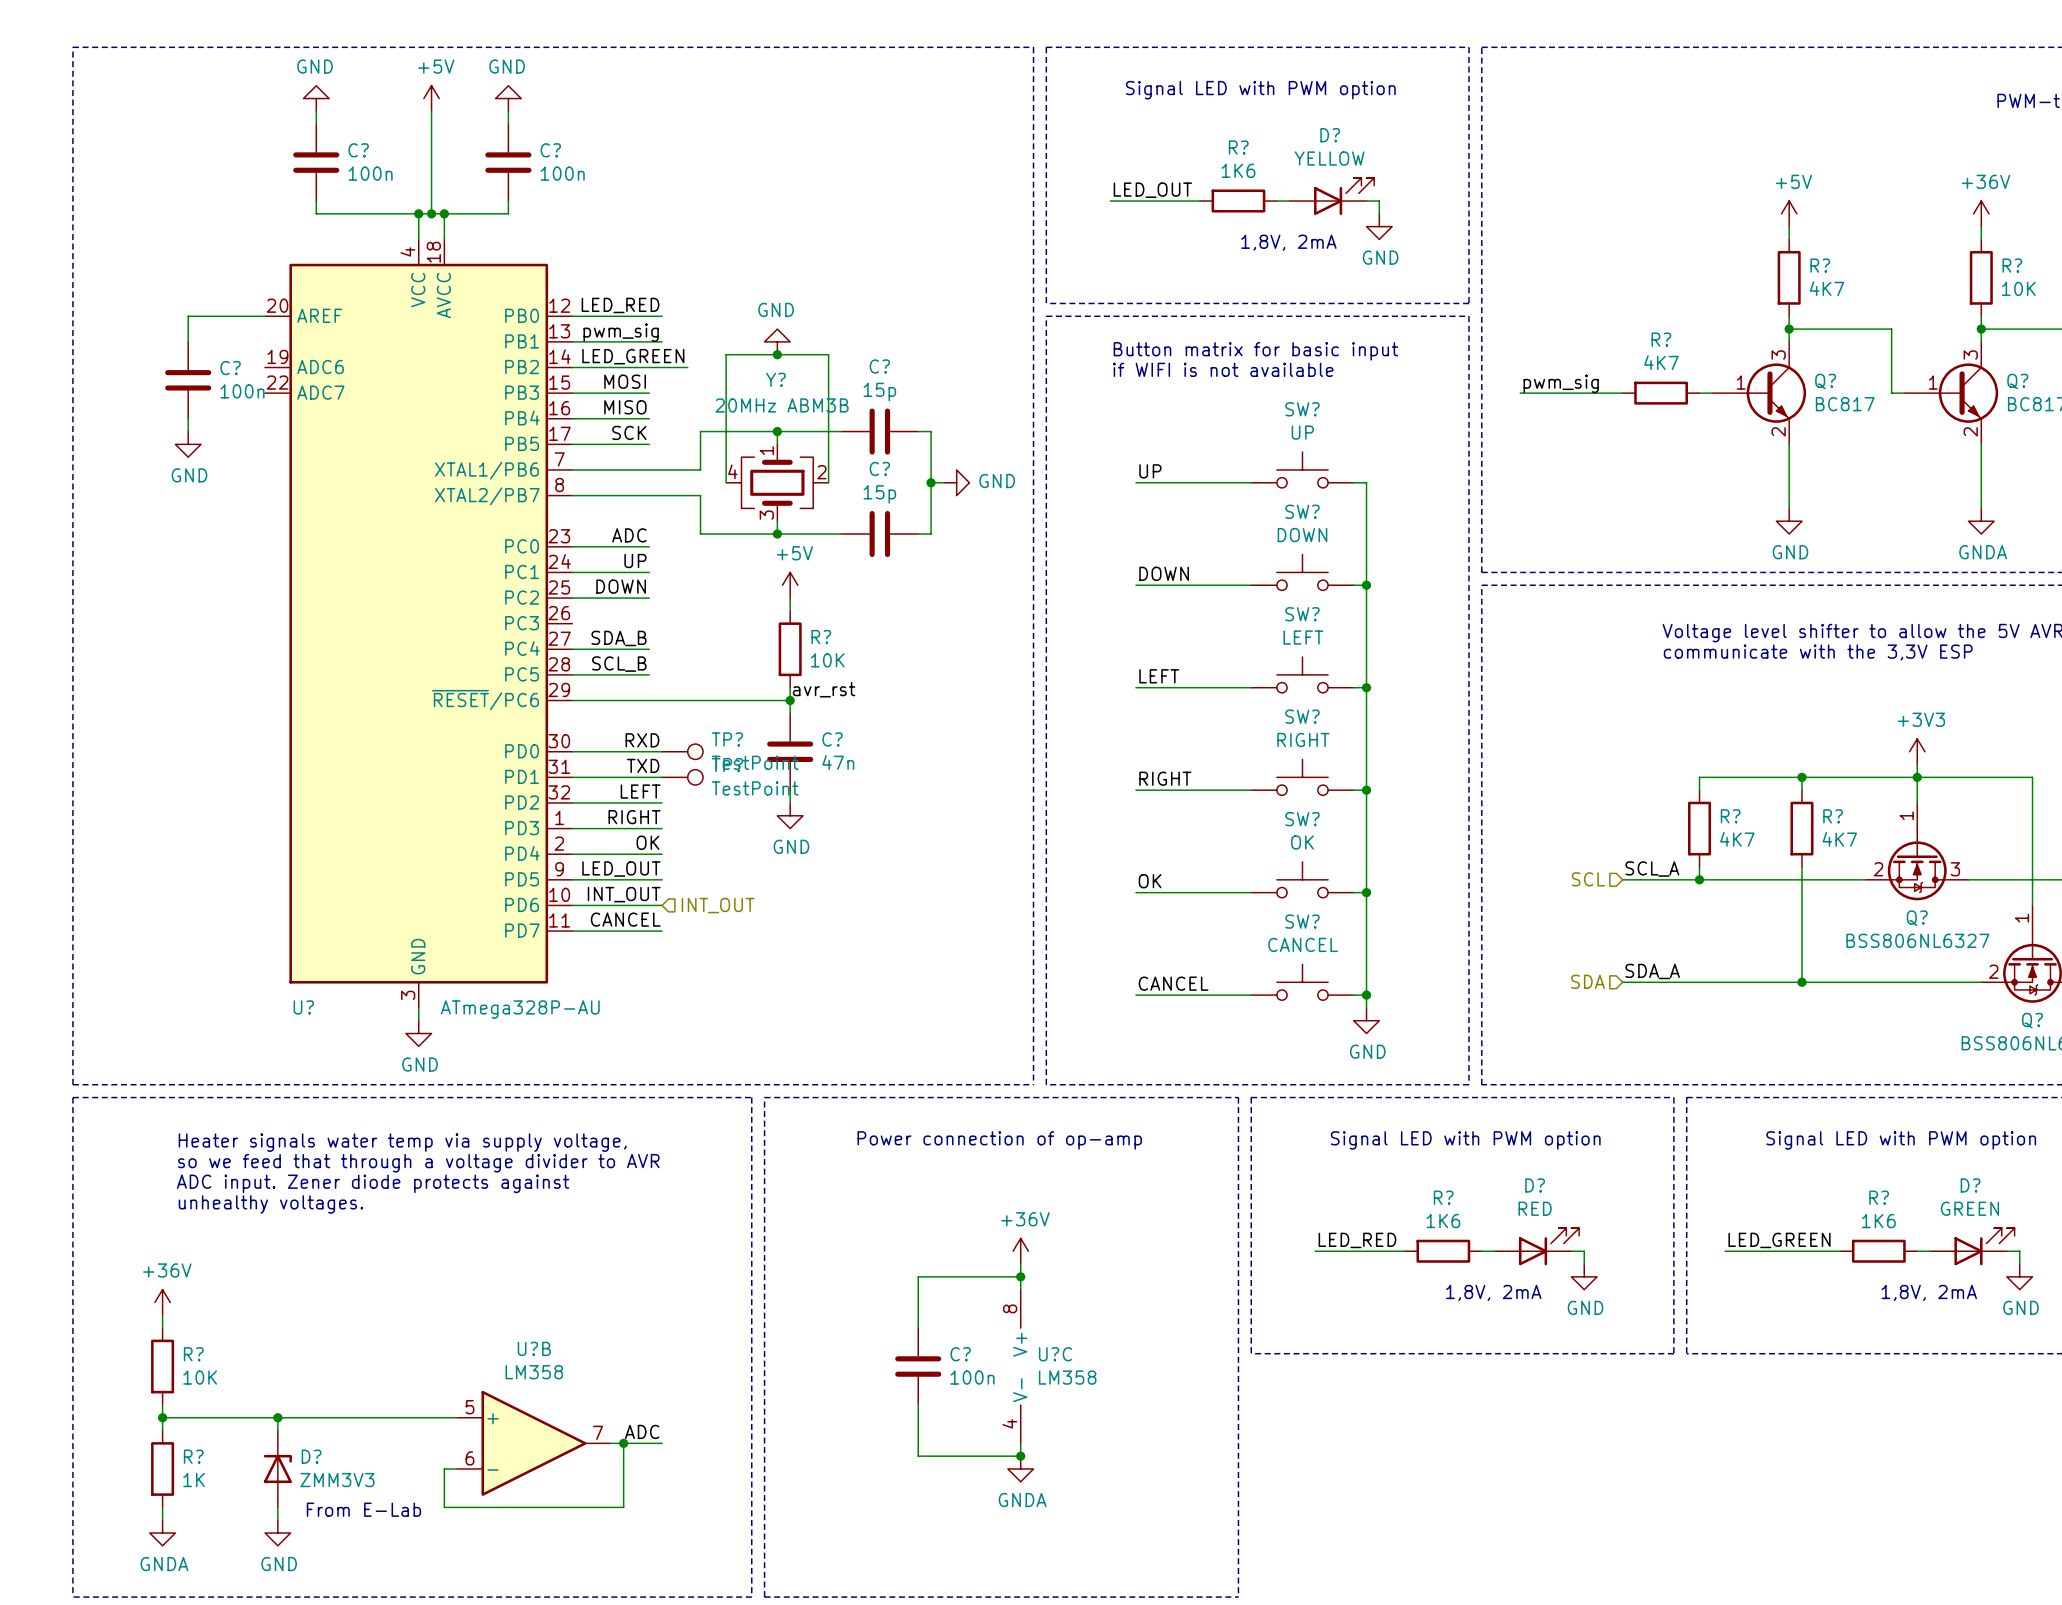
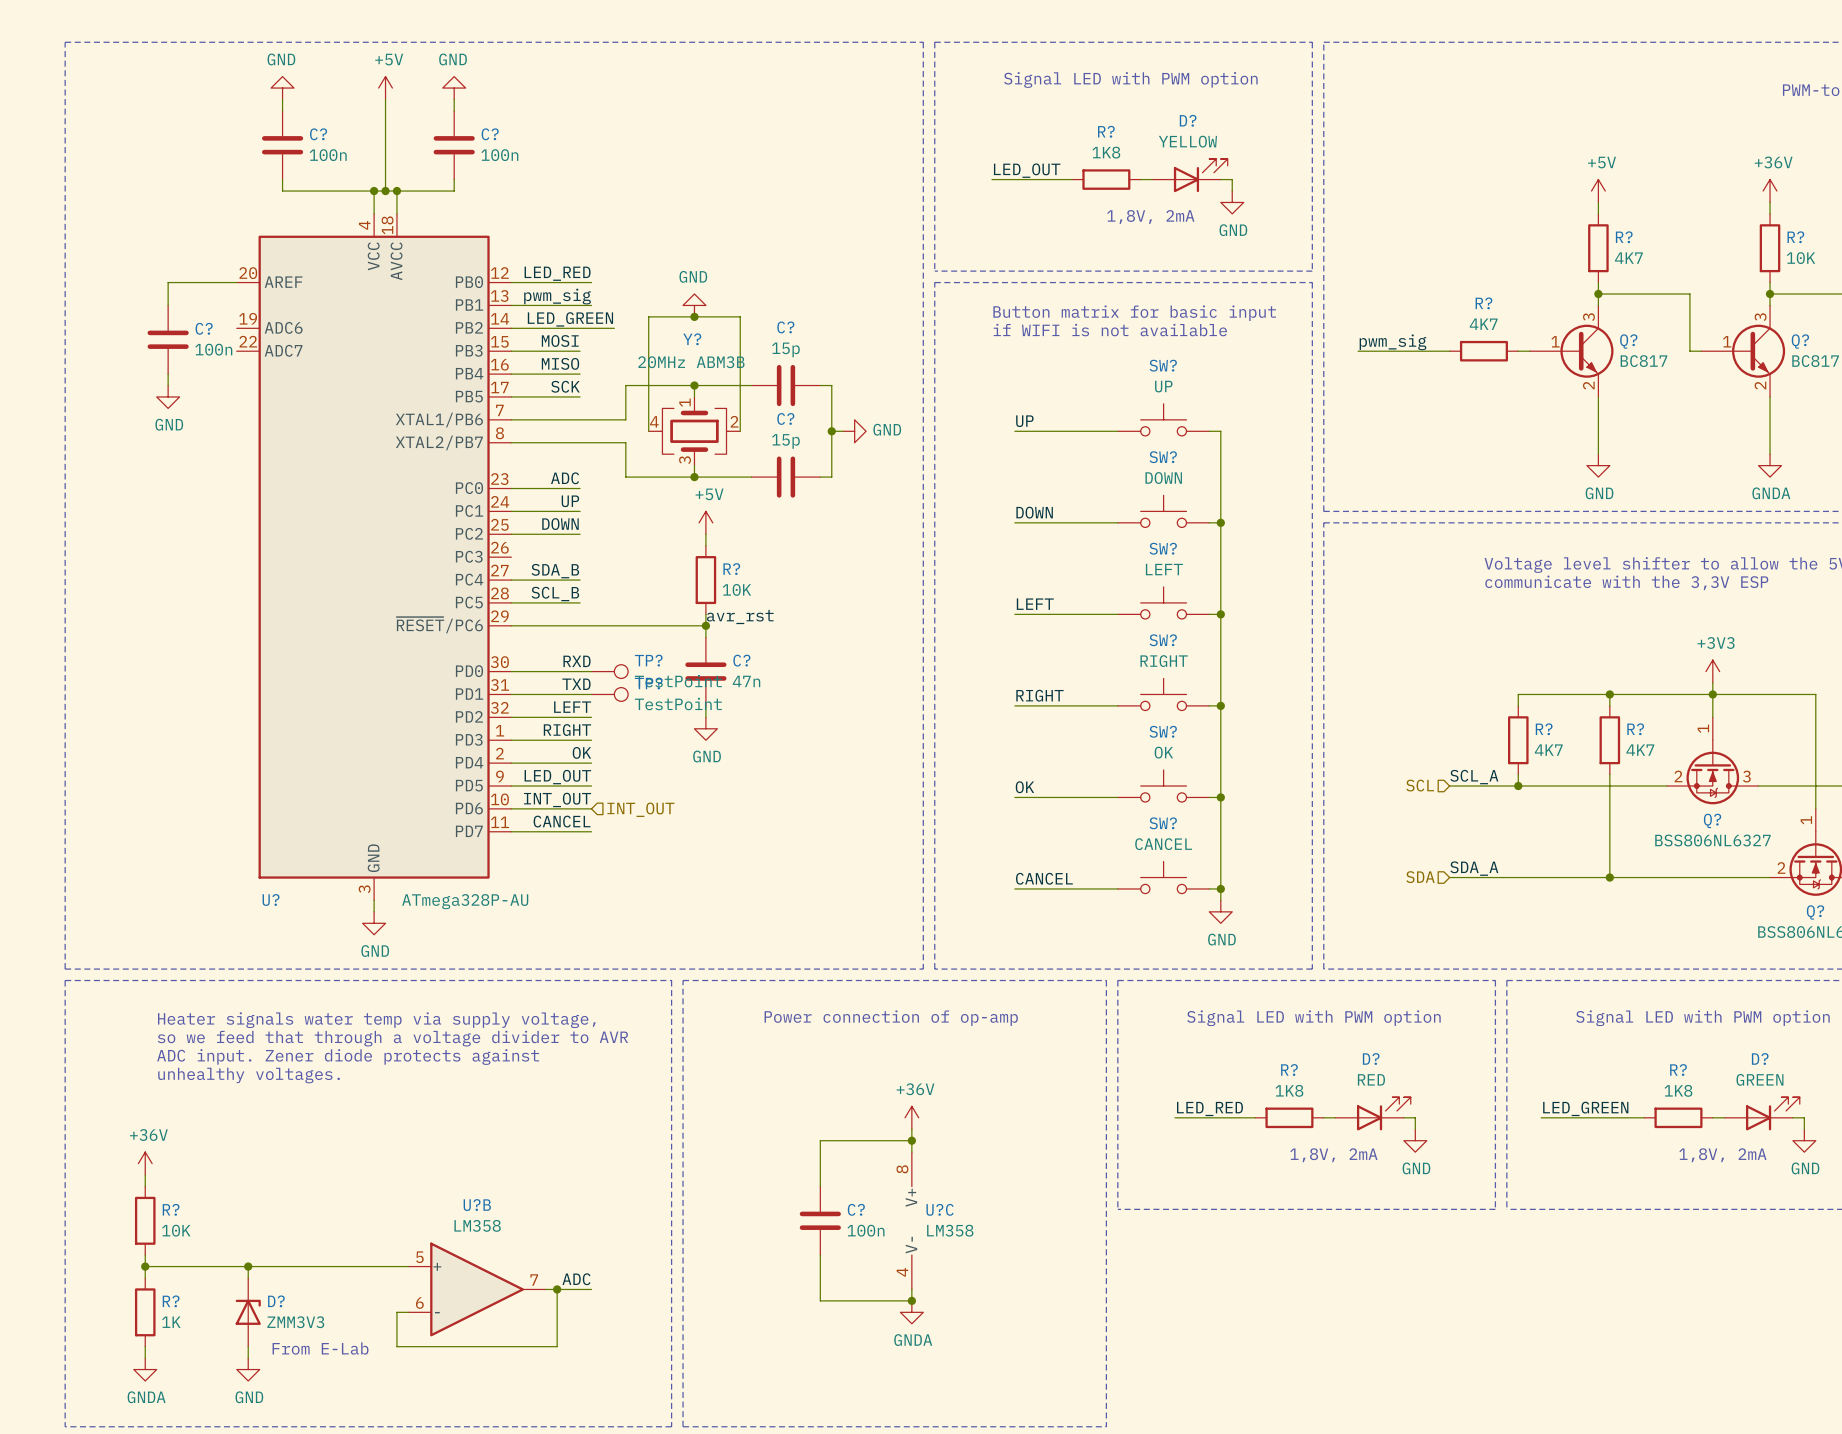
R? value: 1K6 (1238, 170) -> 1K8 (1106, 152)
R? value: 1K6 (1443, 1221) -> 1K8 (1289, 1090)
R? value: 1K6 (1878, 1221) -> 1K8 (1678, 1090)

